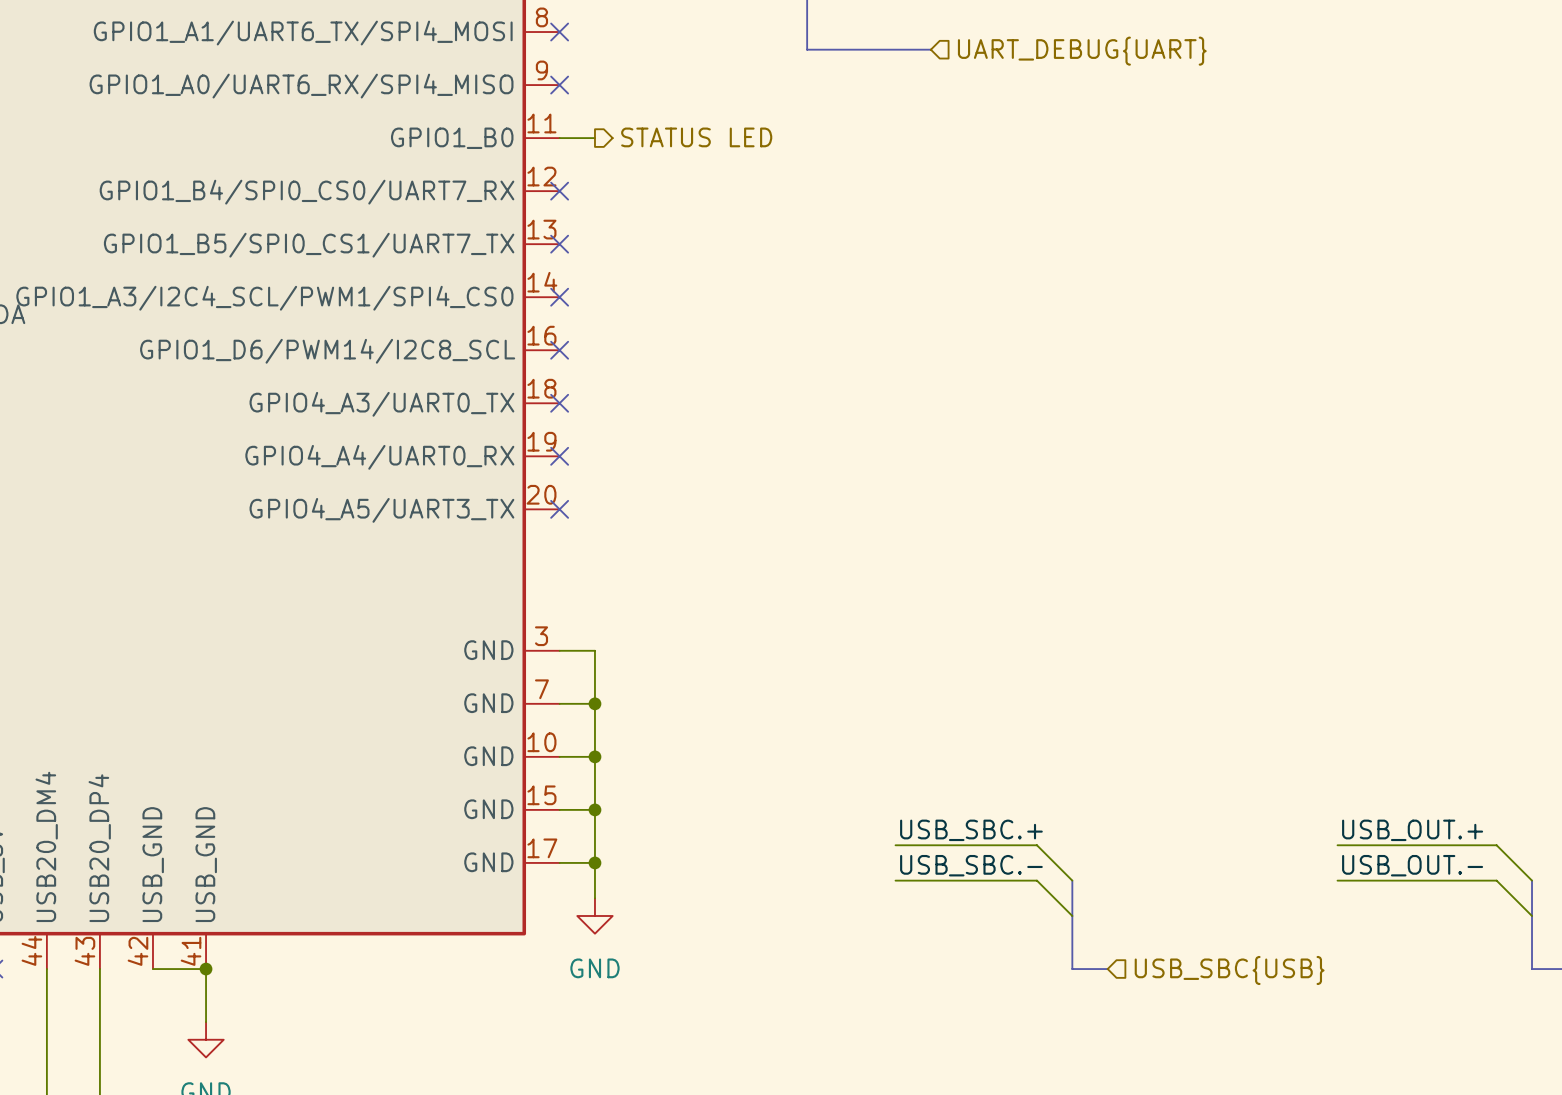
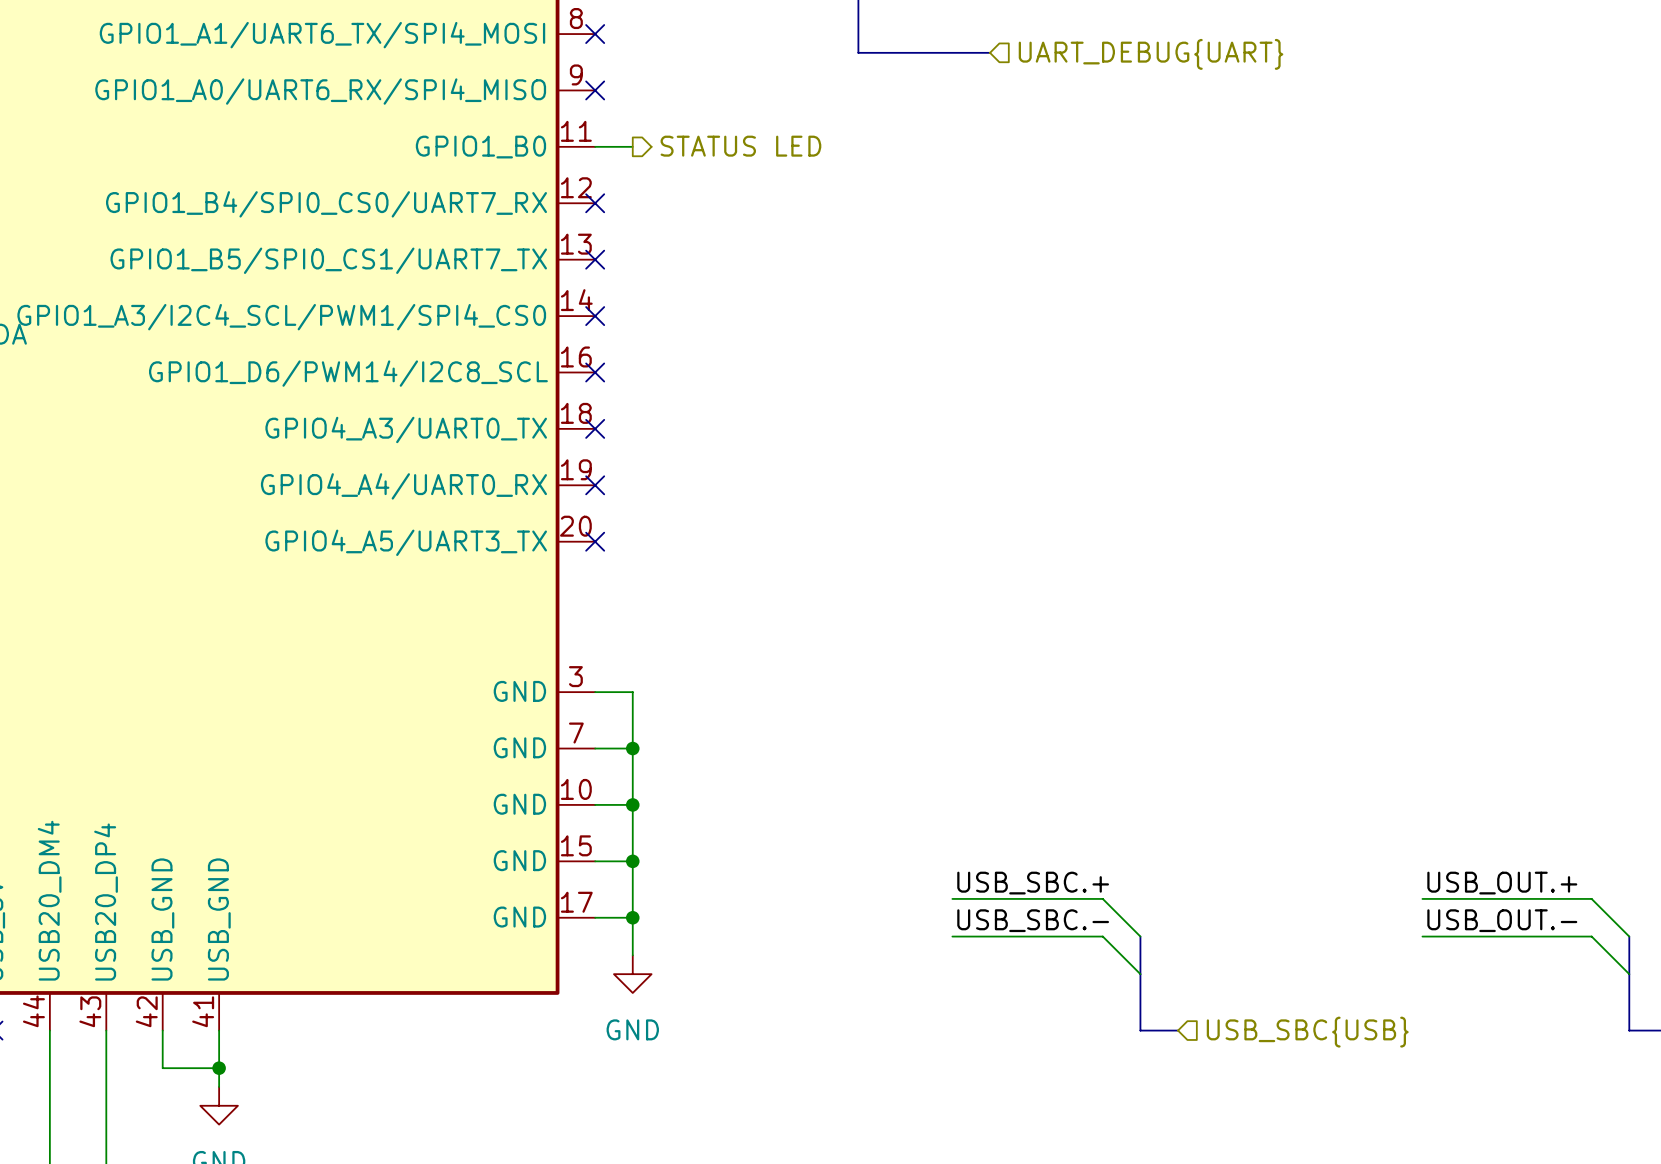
wire: (152, 969) (206, 969) -> (162, 1030) (162, 1068) (219, 1068)
junction position: (206, 969) -> (219, 1068)

